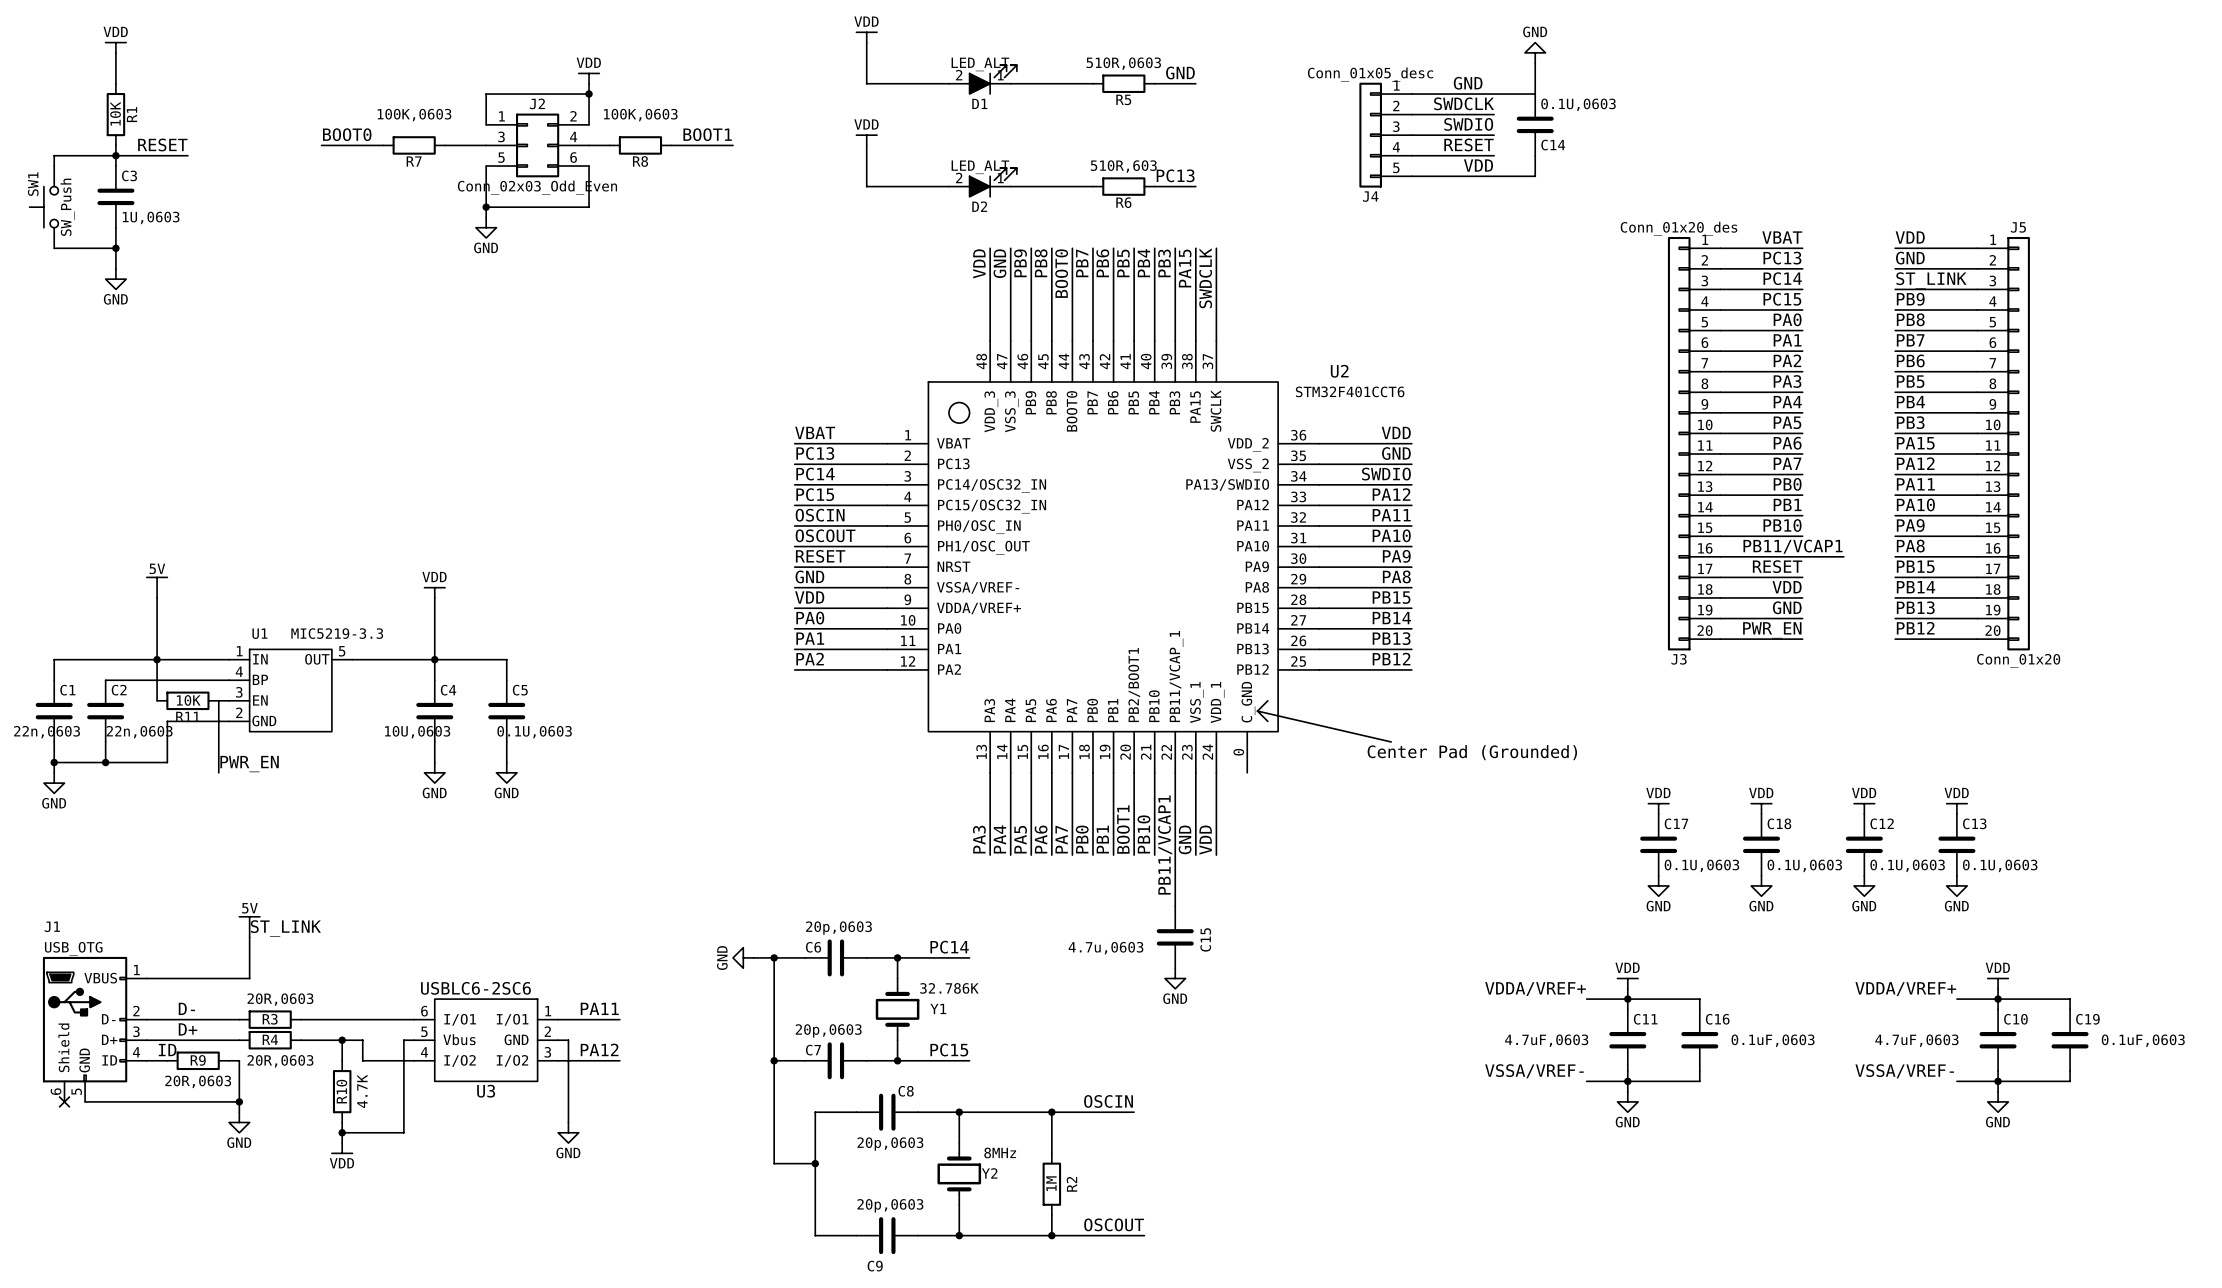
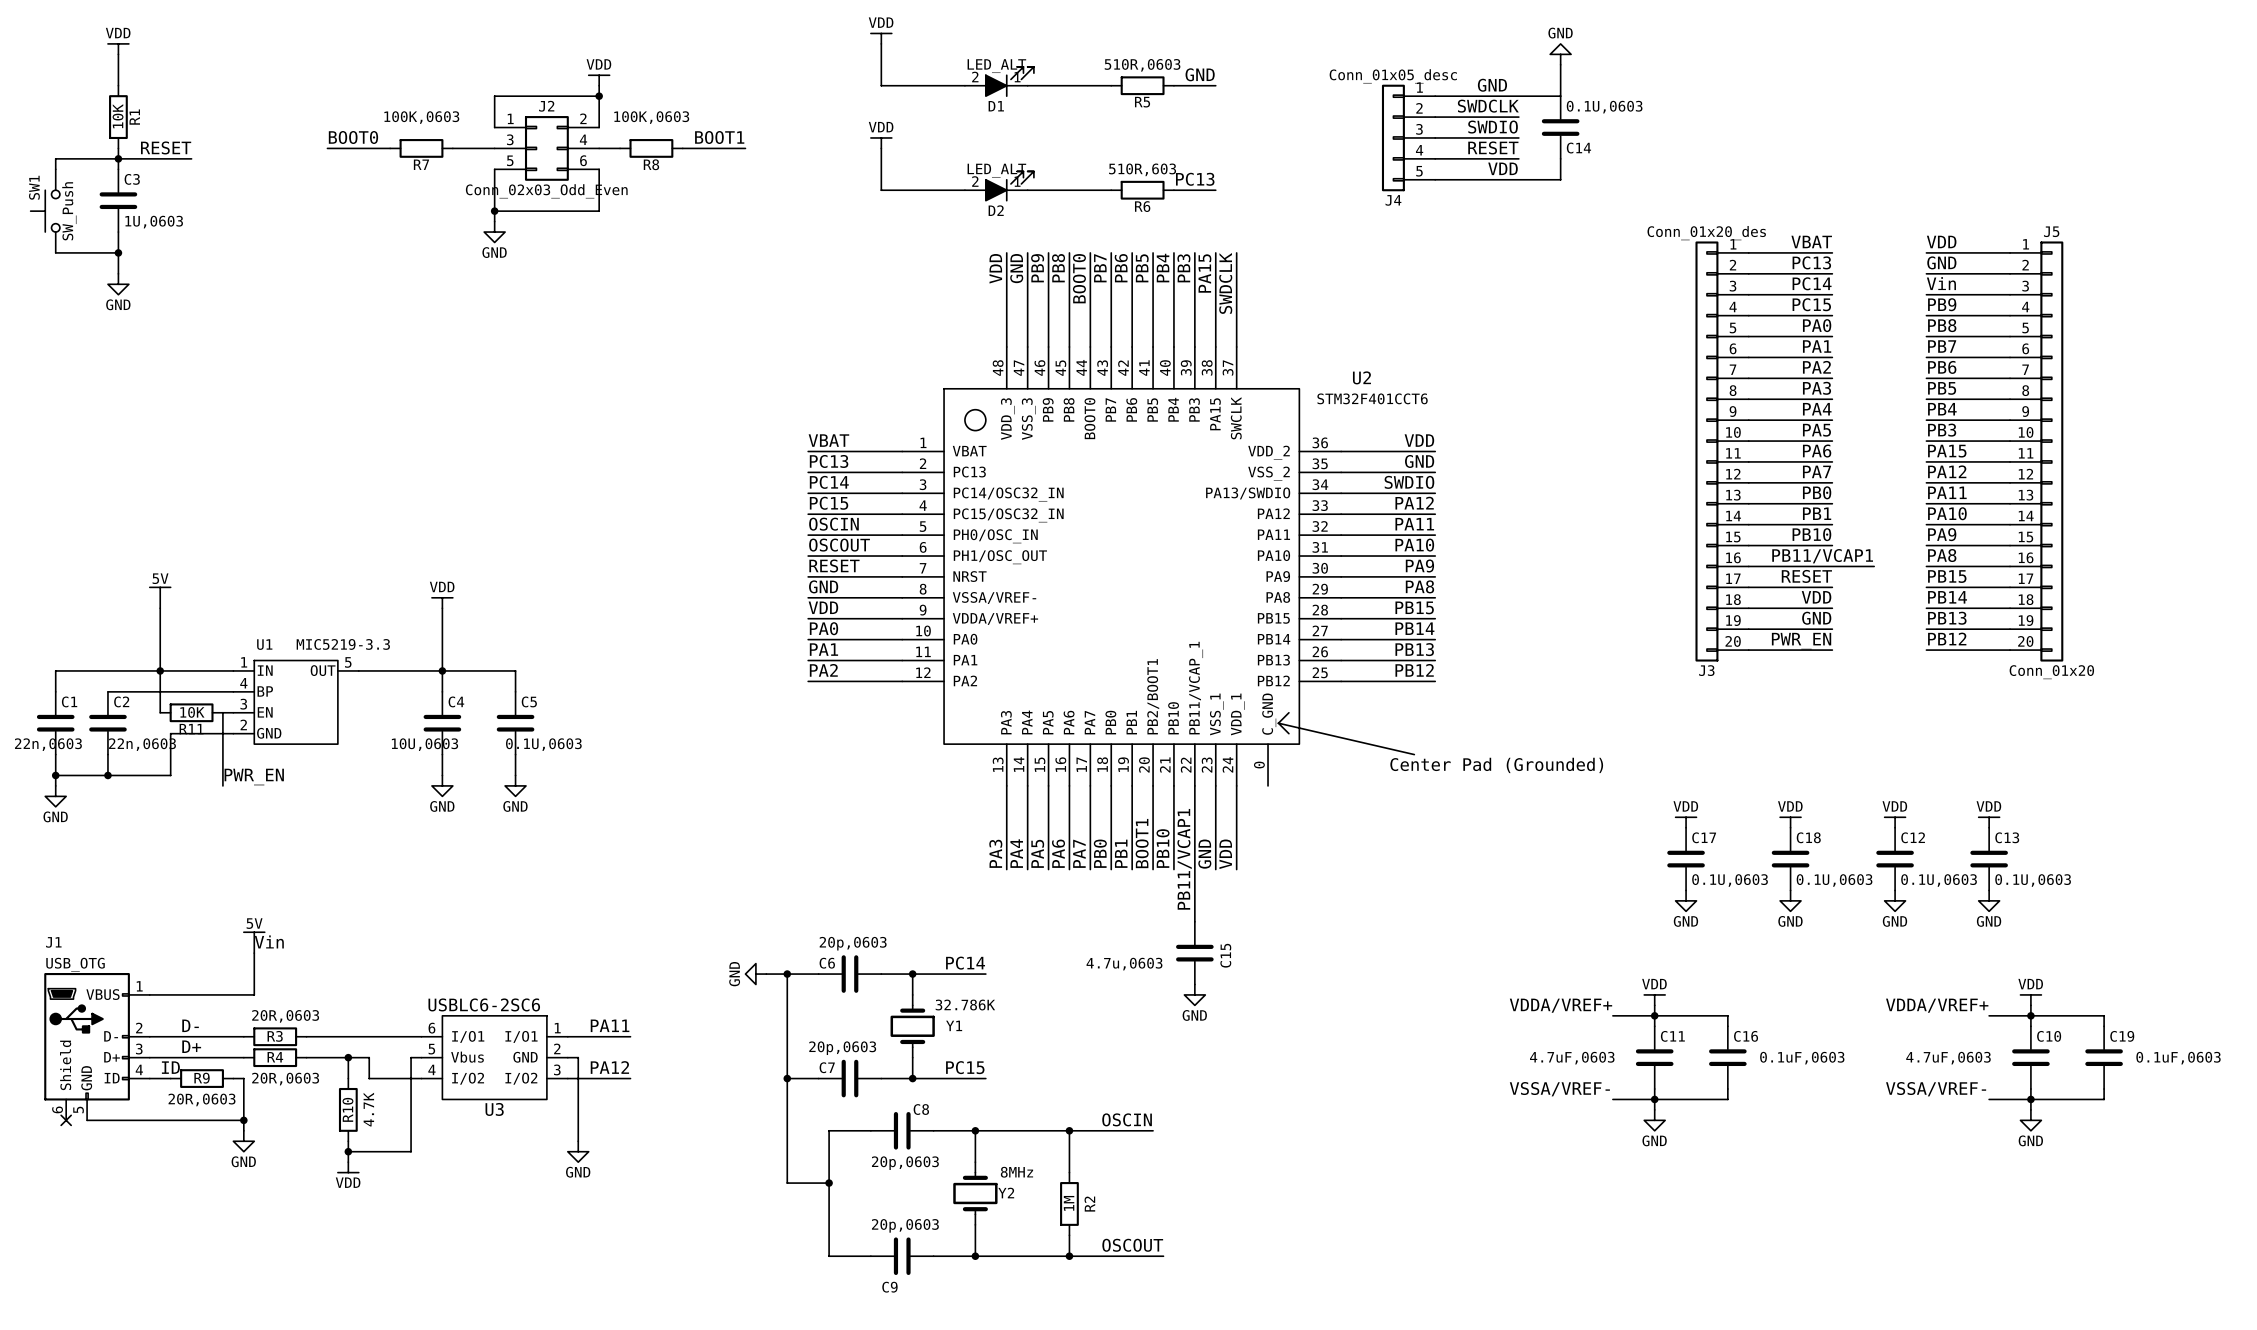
label: ST_LINK (1931, 280) -> Vin (1941, 283)
label: ST_LINK (285, 928) -> Vin (269, 941)

